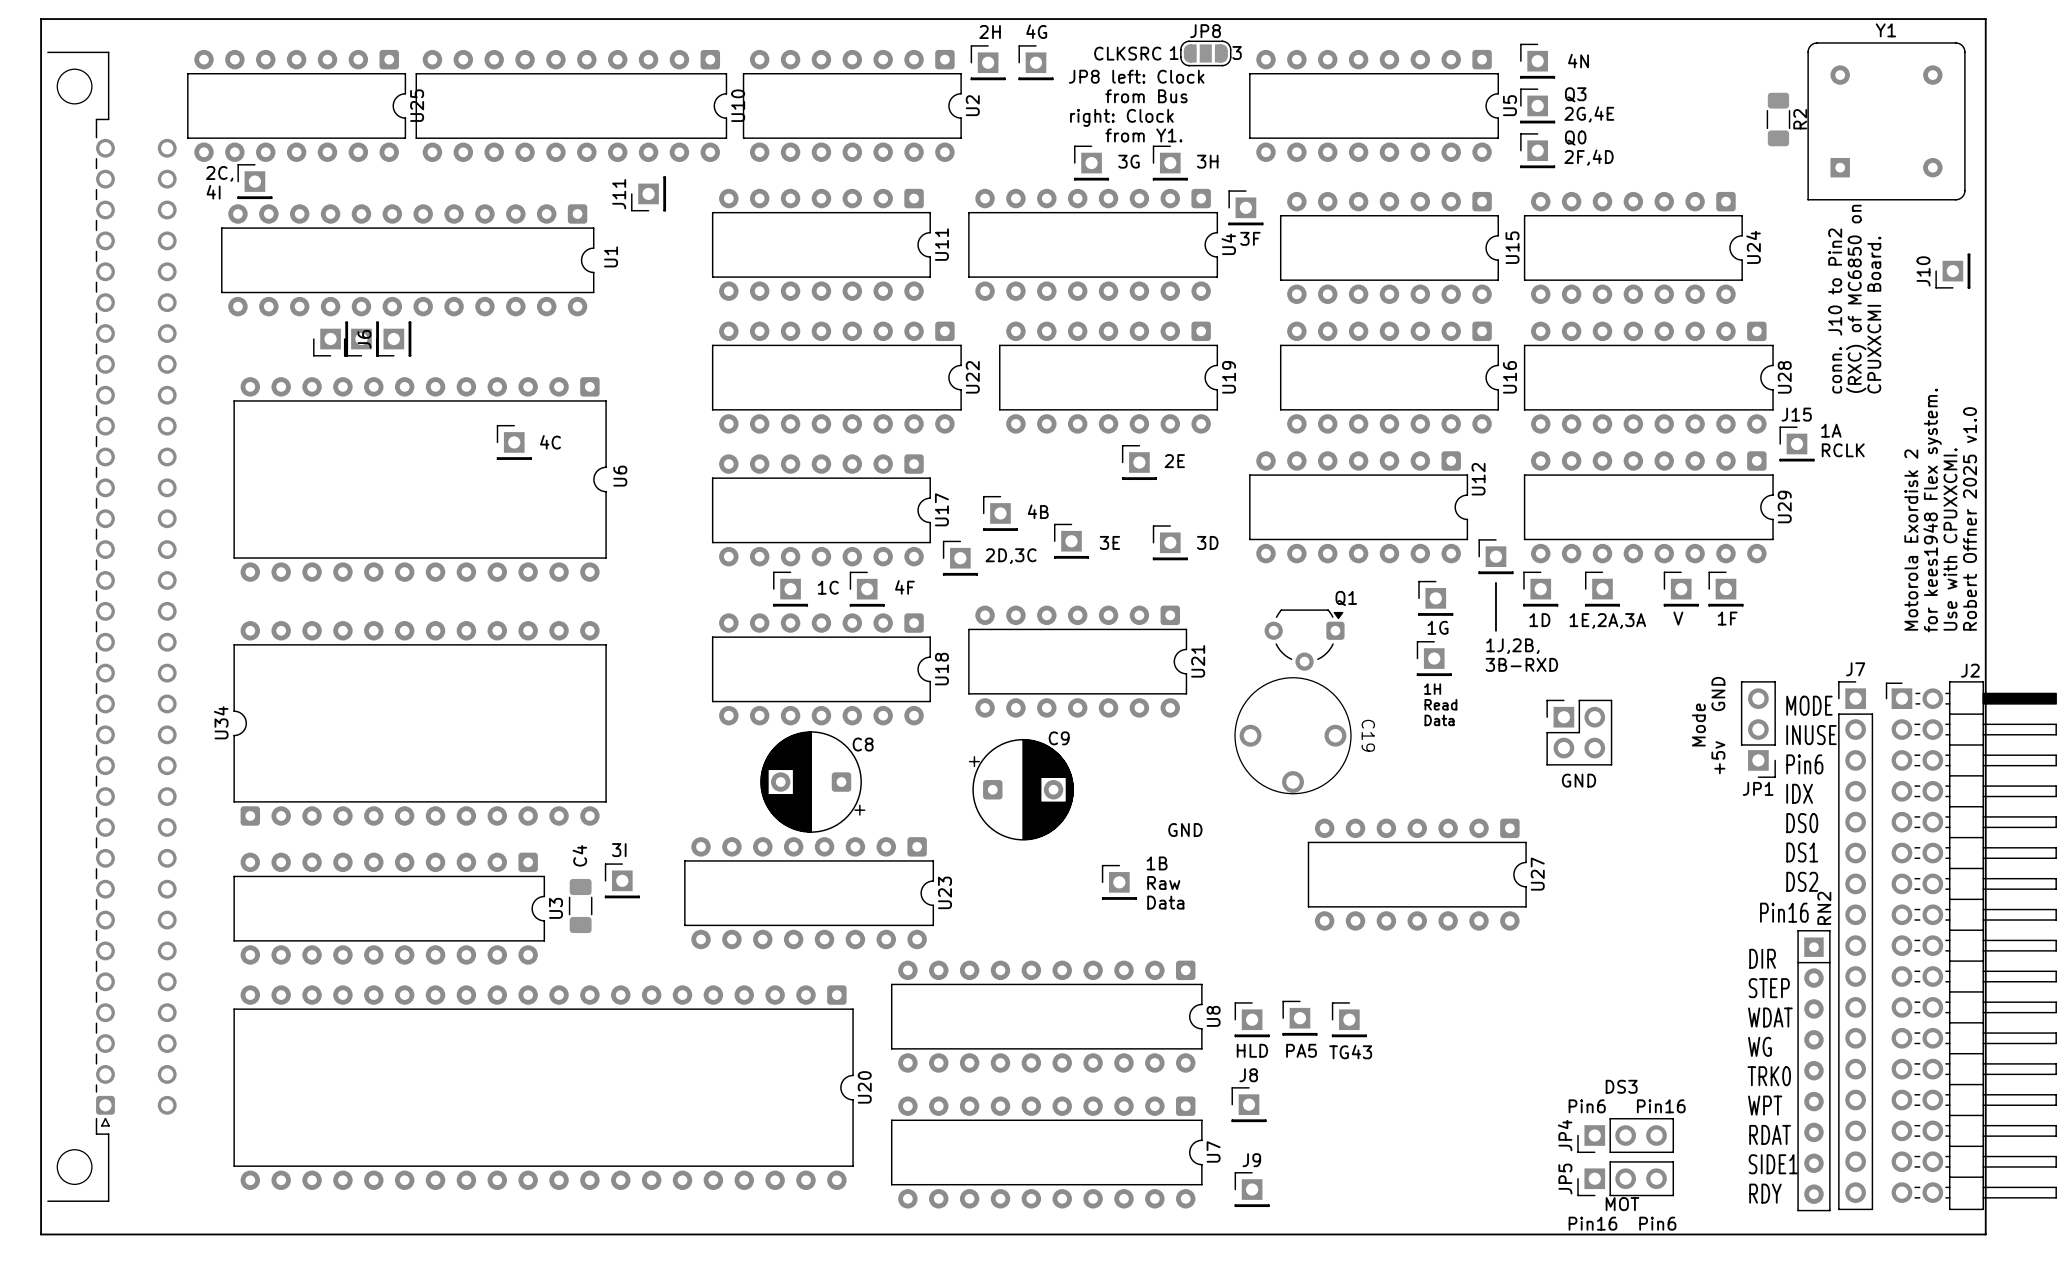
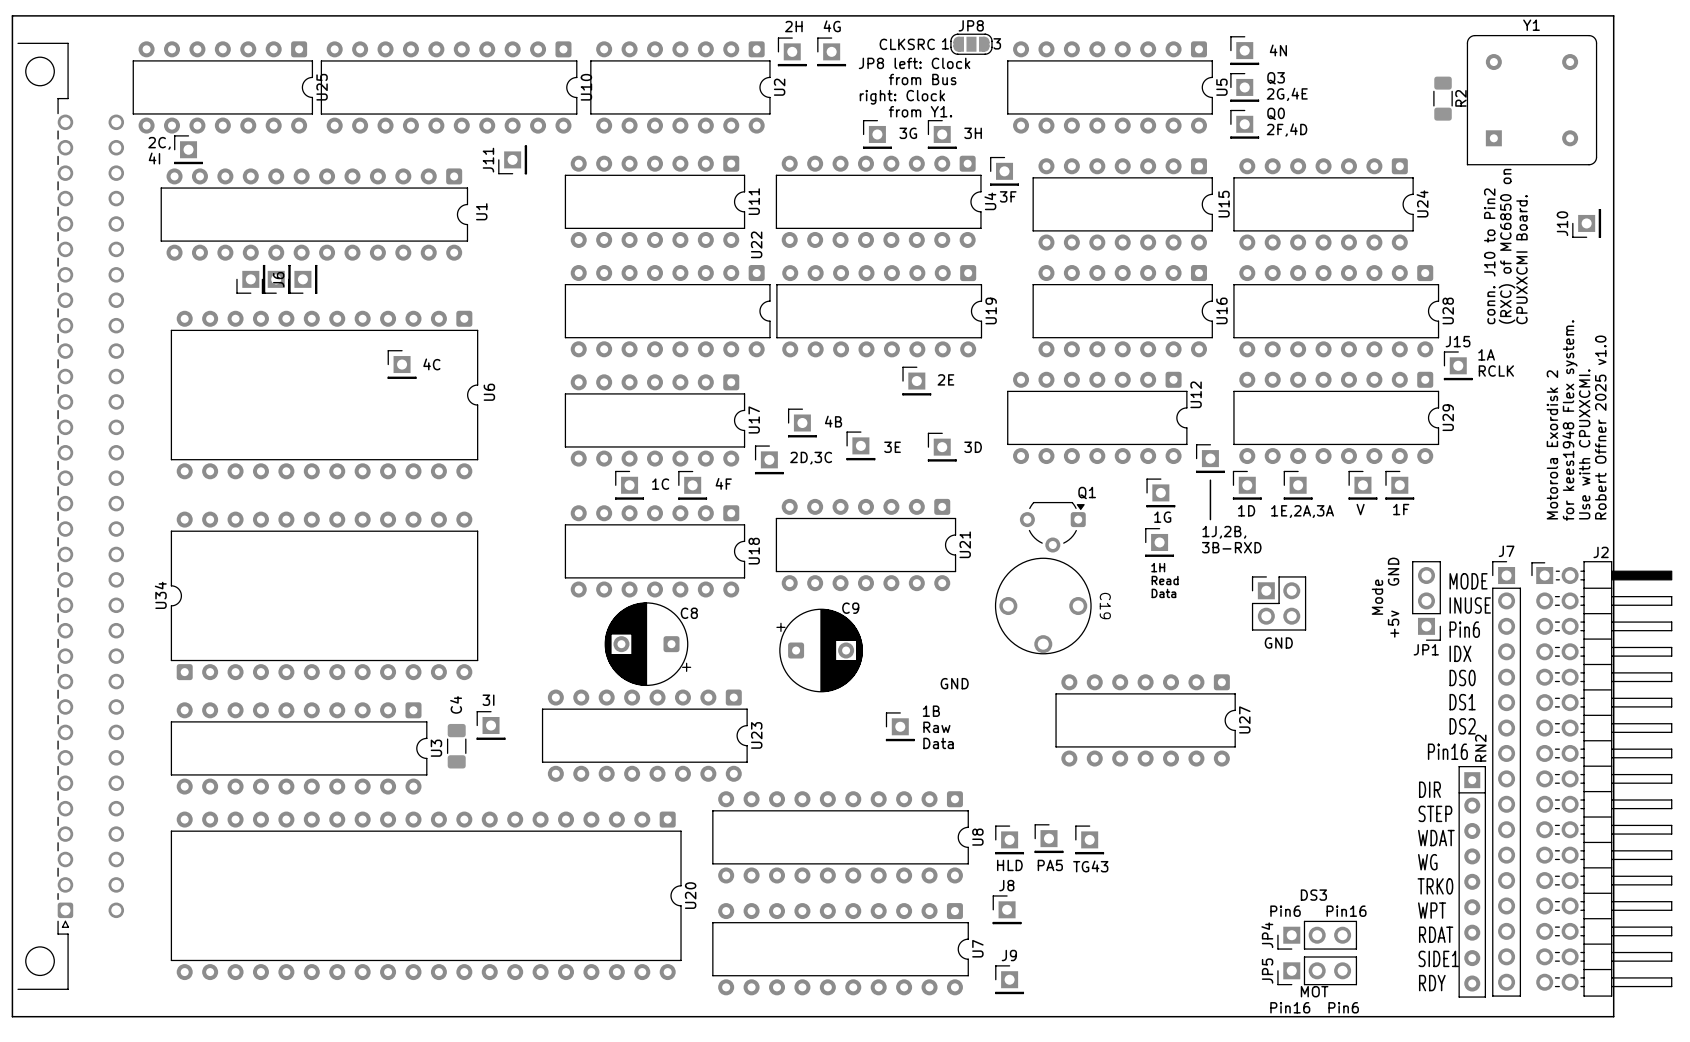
U19 footprint: [999, 321, 1219, 434] -> [776, 265, 983, 358]
U22 name position: U22 (972, 377) -> U22 (756, 244)

